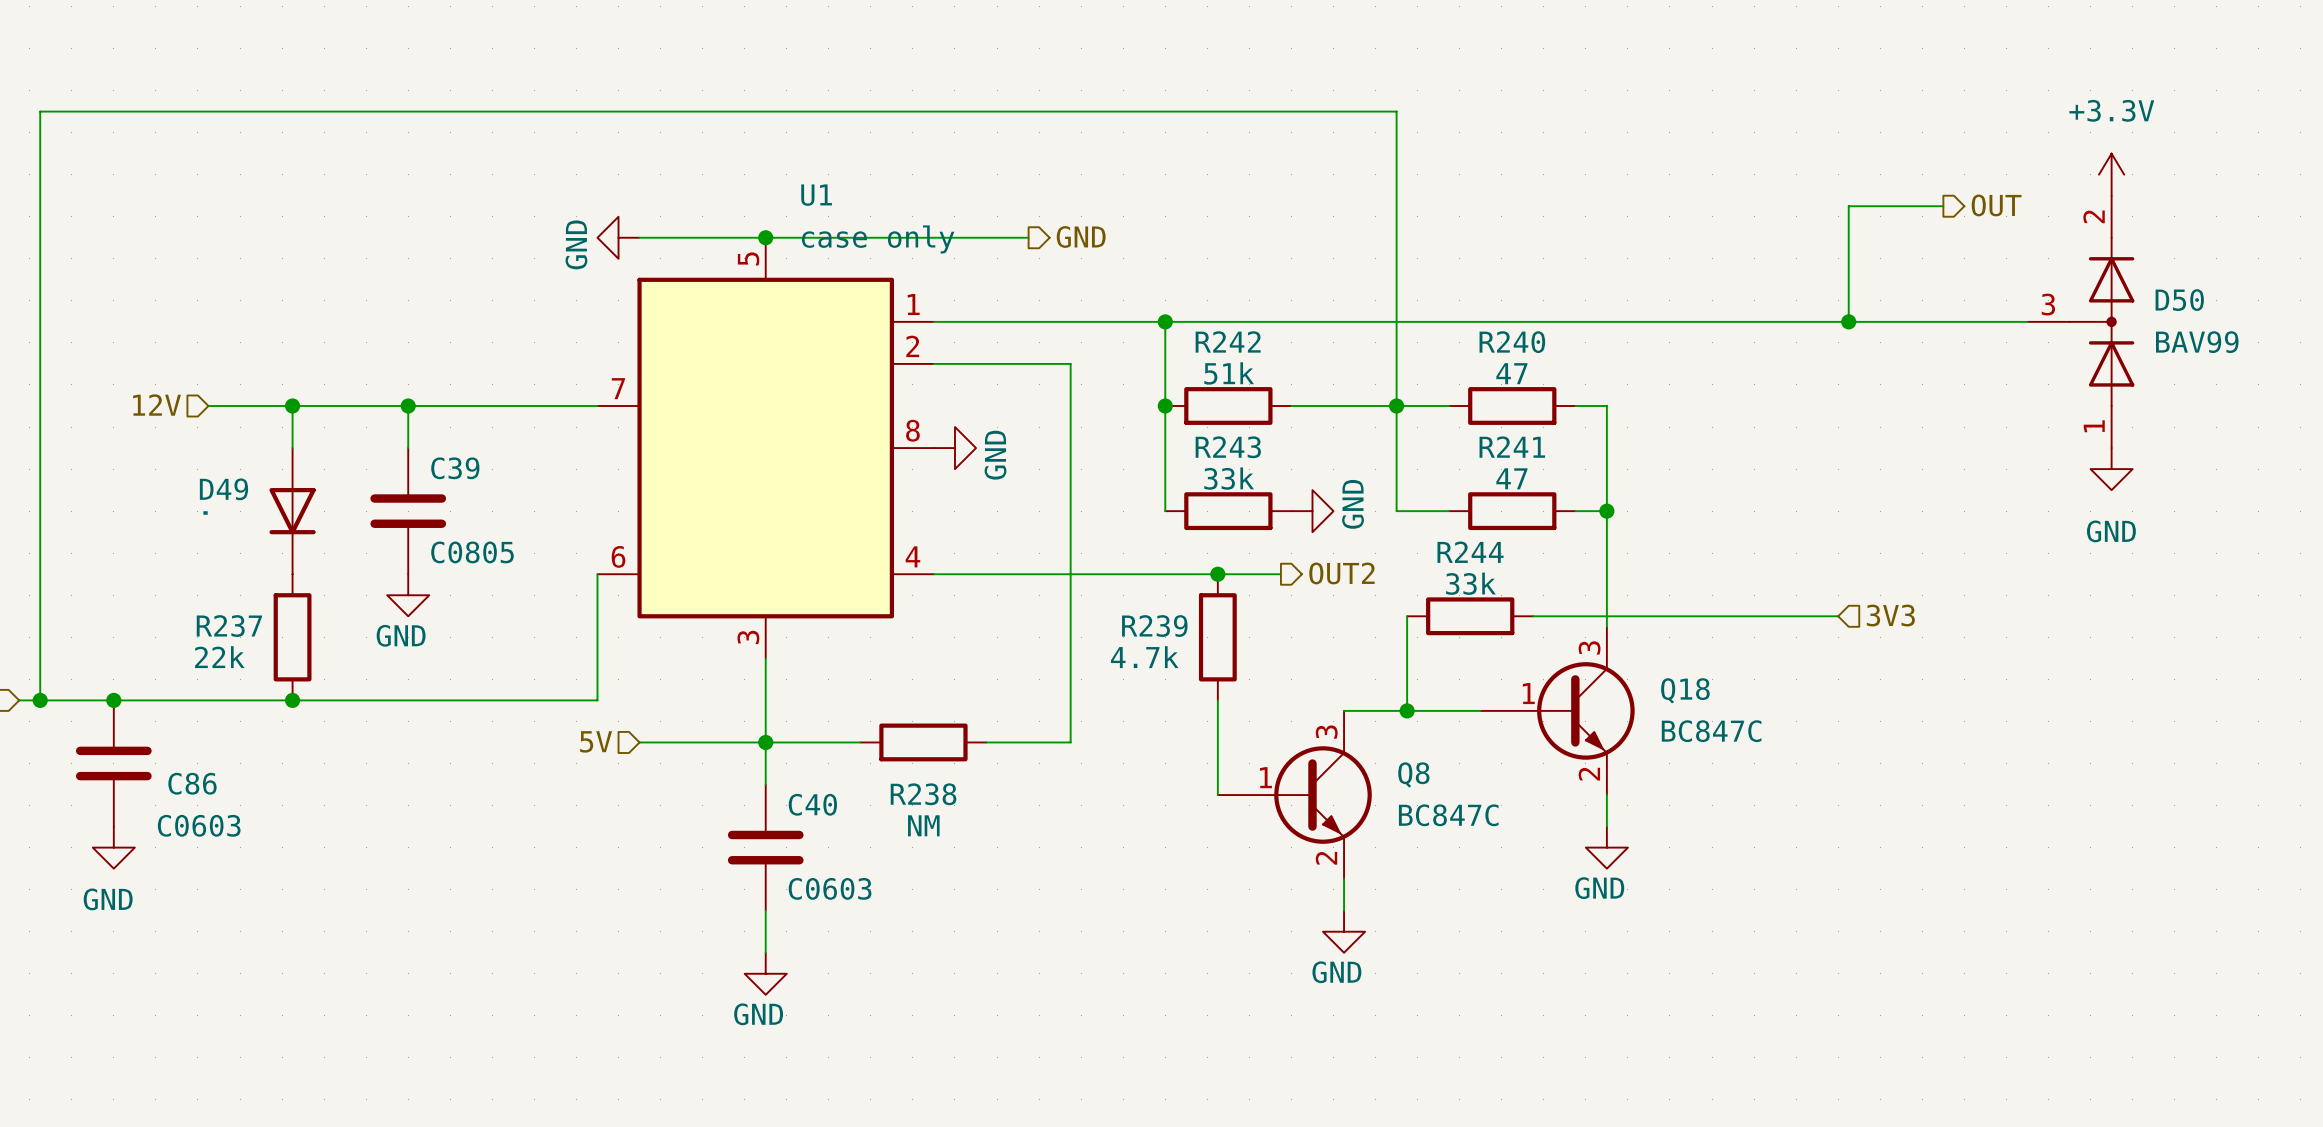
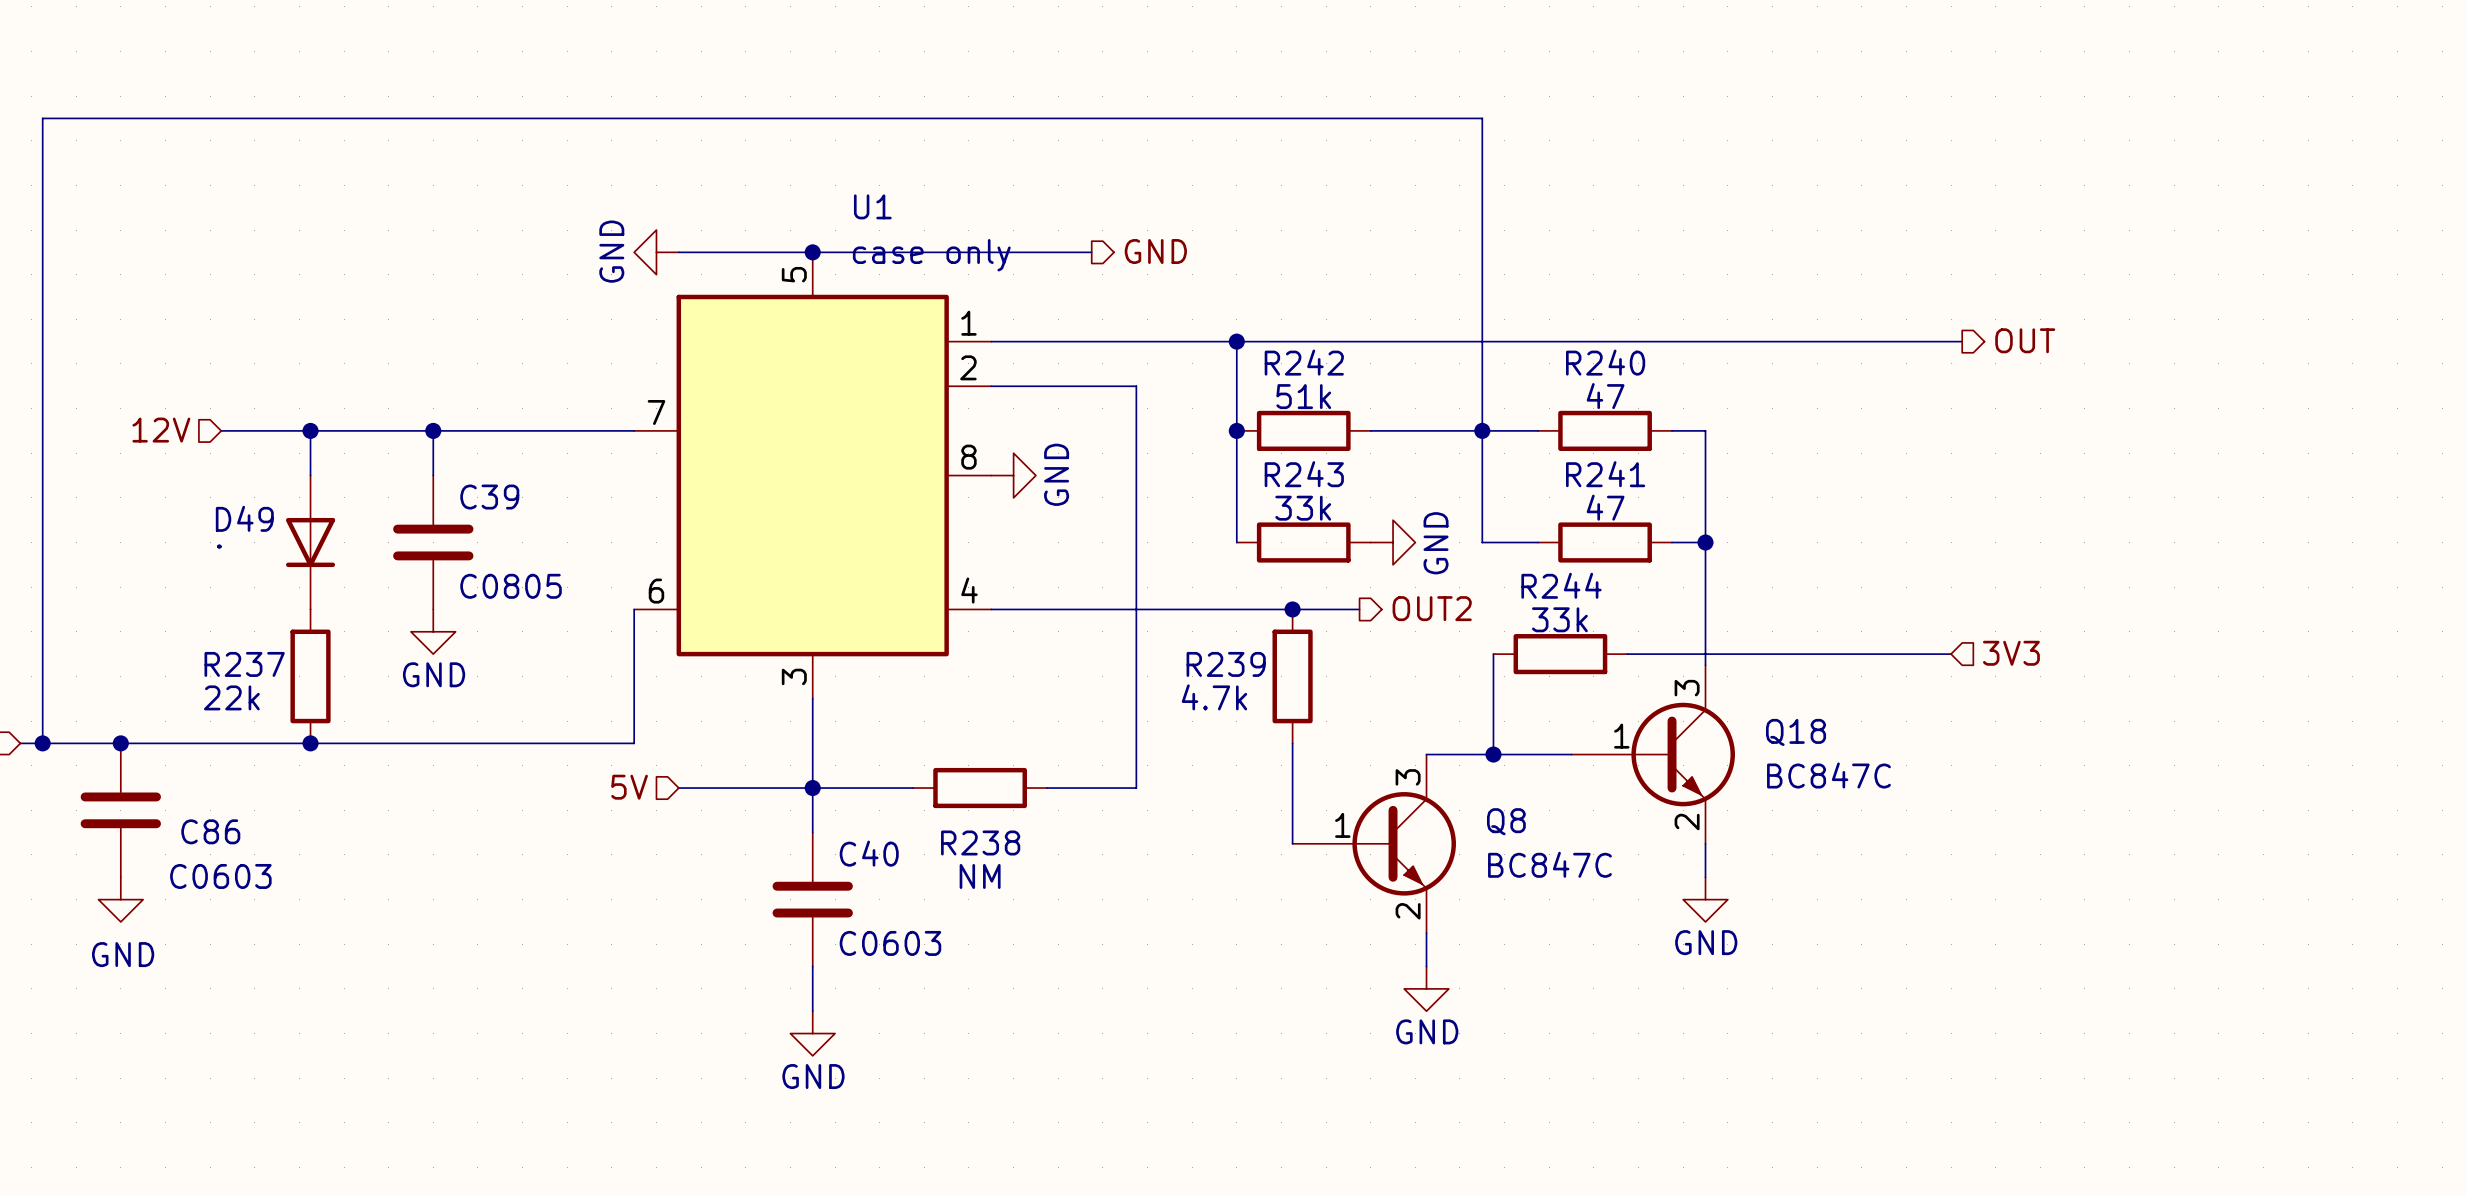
power symbol: +3.3V (2111, 174) -> none
hierarchical label position: OUT (1996, 205) -> OUT (2025, 340)
wire: (1943, 206) (1848, 206) (1848, 321) (2027, 321) -> none
junction: (1848, 321) -> none
D50: BAV99 (2080, 321) -> none
power symbol: GND (2111, 469) -> none

